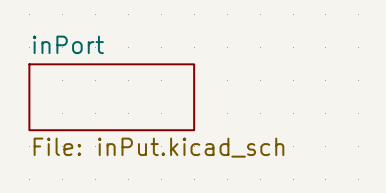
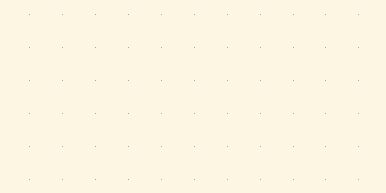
sheet inPort: File: inPut.kicad_sch (111, 97) -> none

